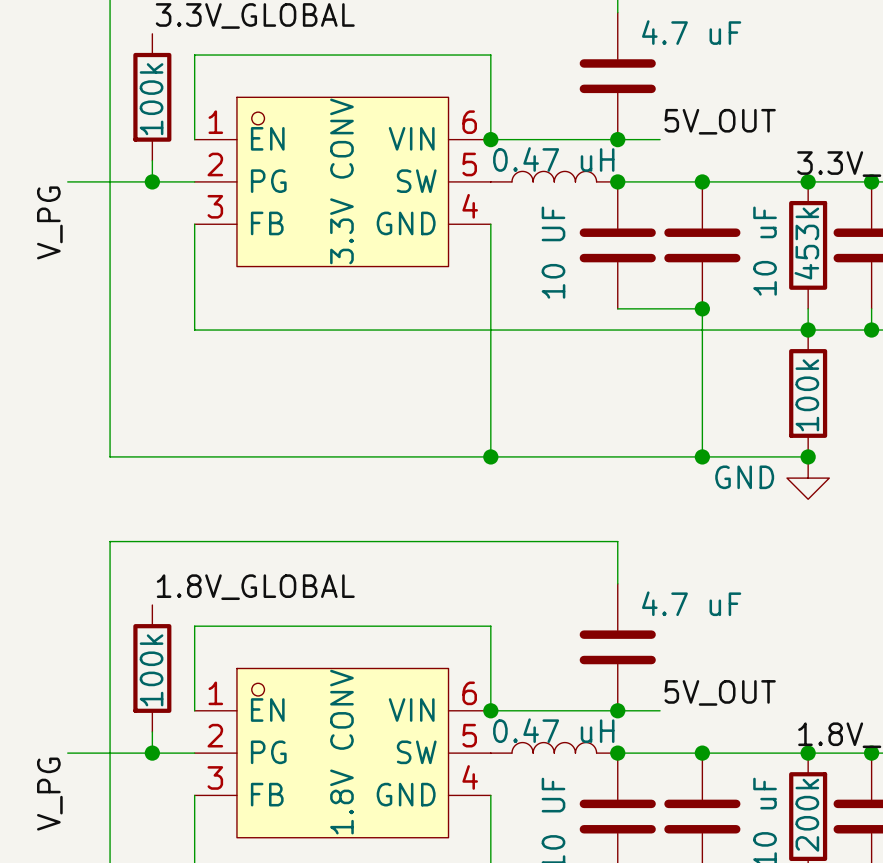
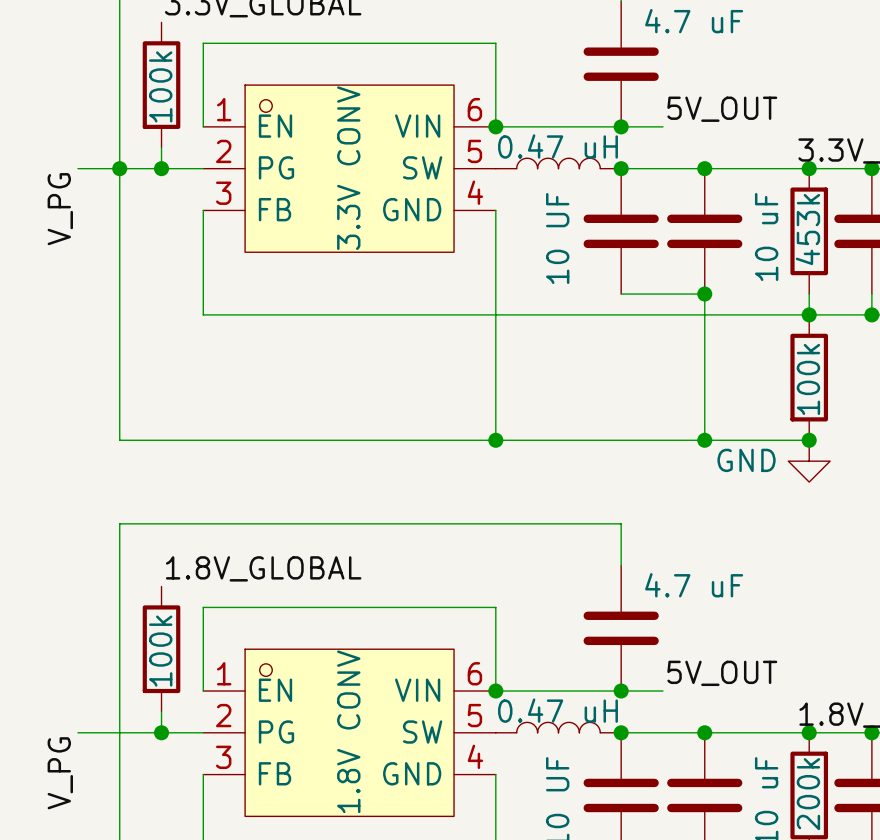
junction: none -> (119, 168)

